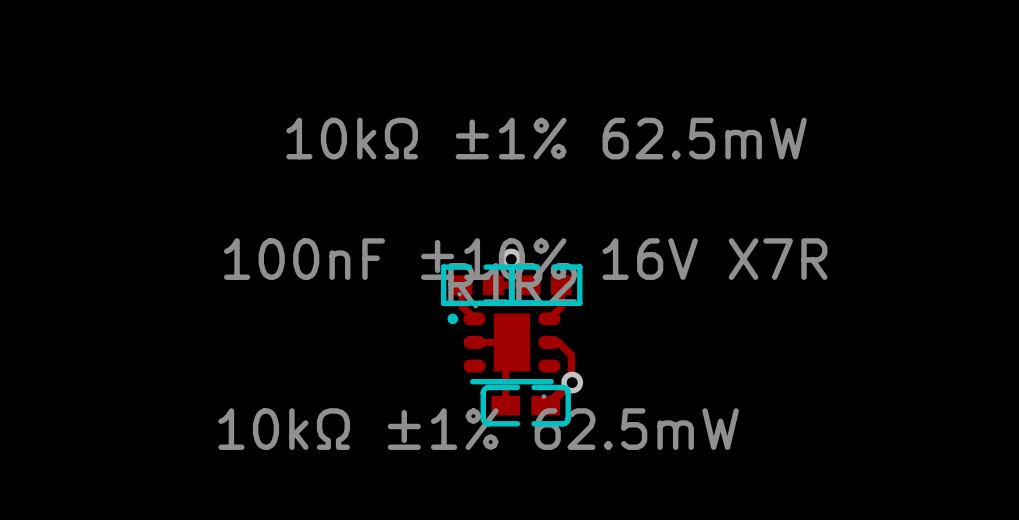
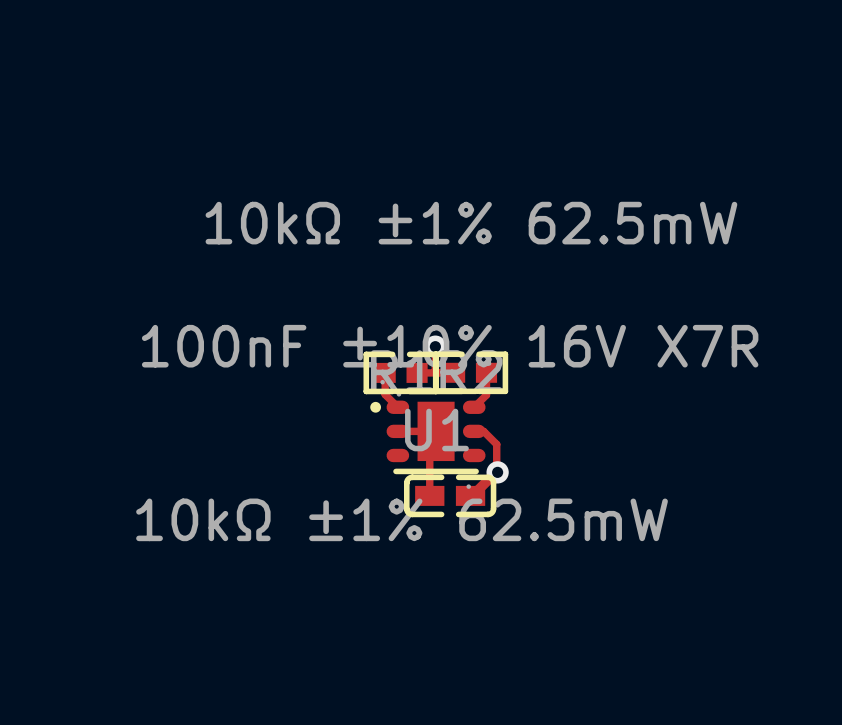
U1 name: none -> U1 (436, 429)

